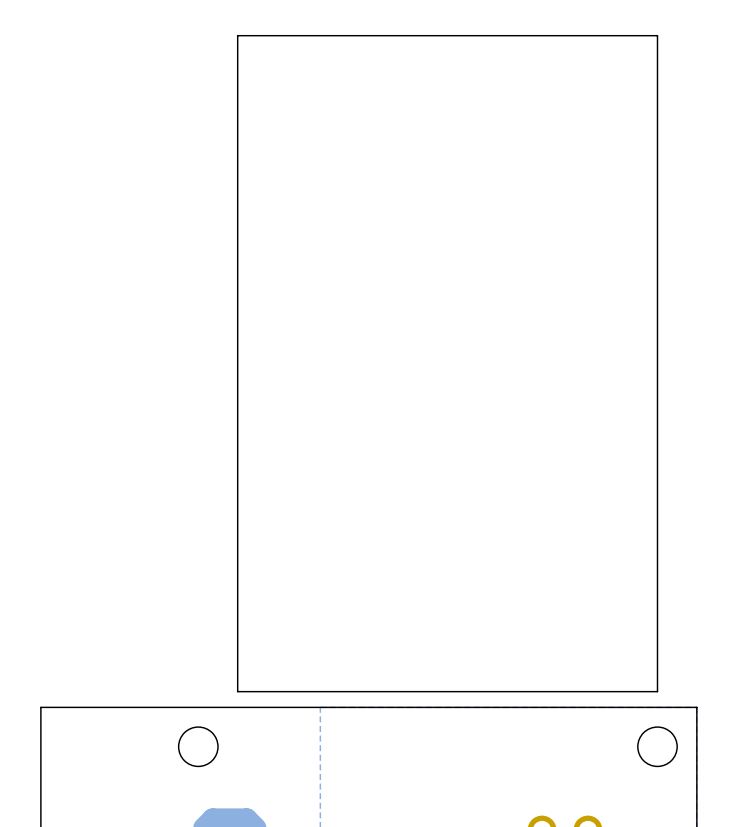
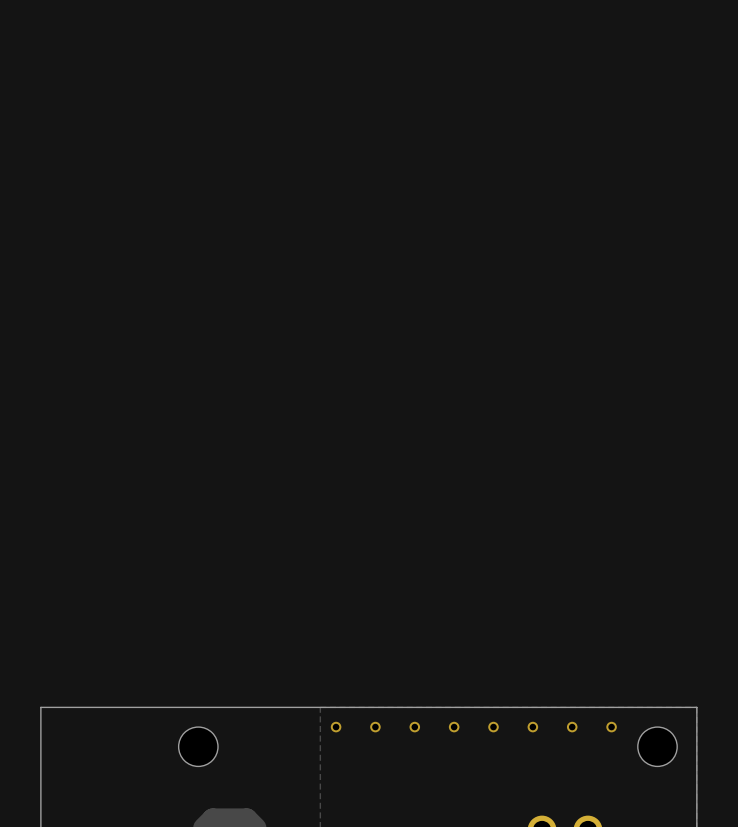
board edge: (657, 35) (237, 35) (237, 691) (657, 691) (657, 35) -> none
via: none -> (336, 727)
via: none -> (375, 727)
via: none -> (414, 727)
via: none -> (454, 727)
via: none -> (493, 727)
via: none -> (532, 727)
via: none -> (572, 727)
via: none -> (611, 727)

